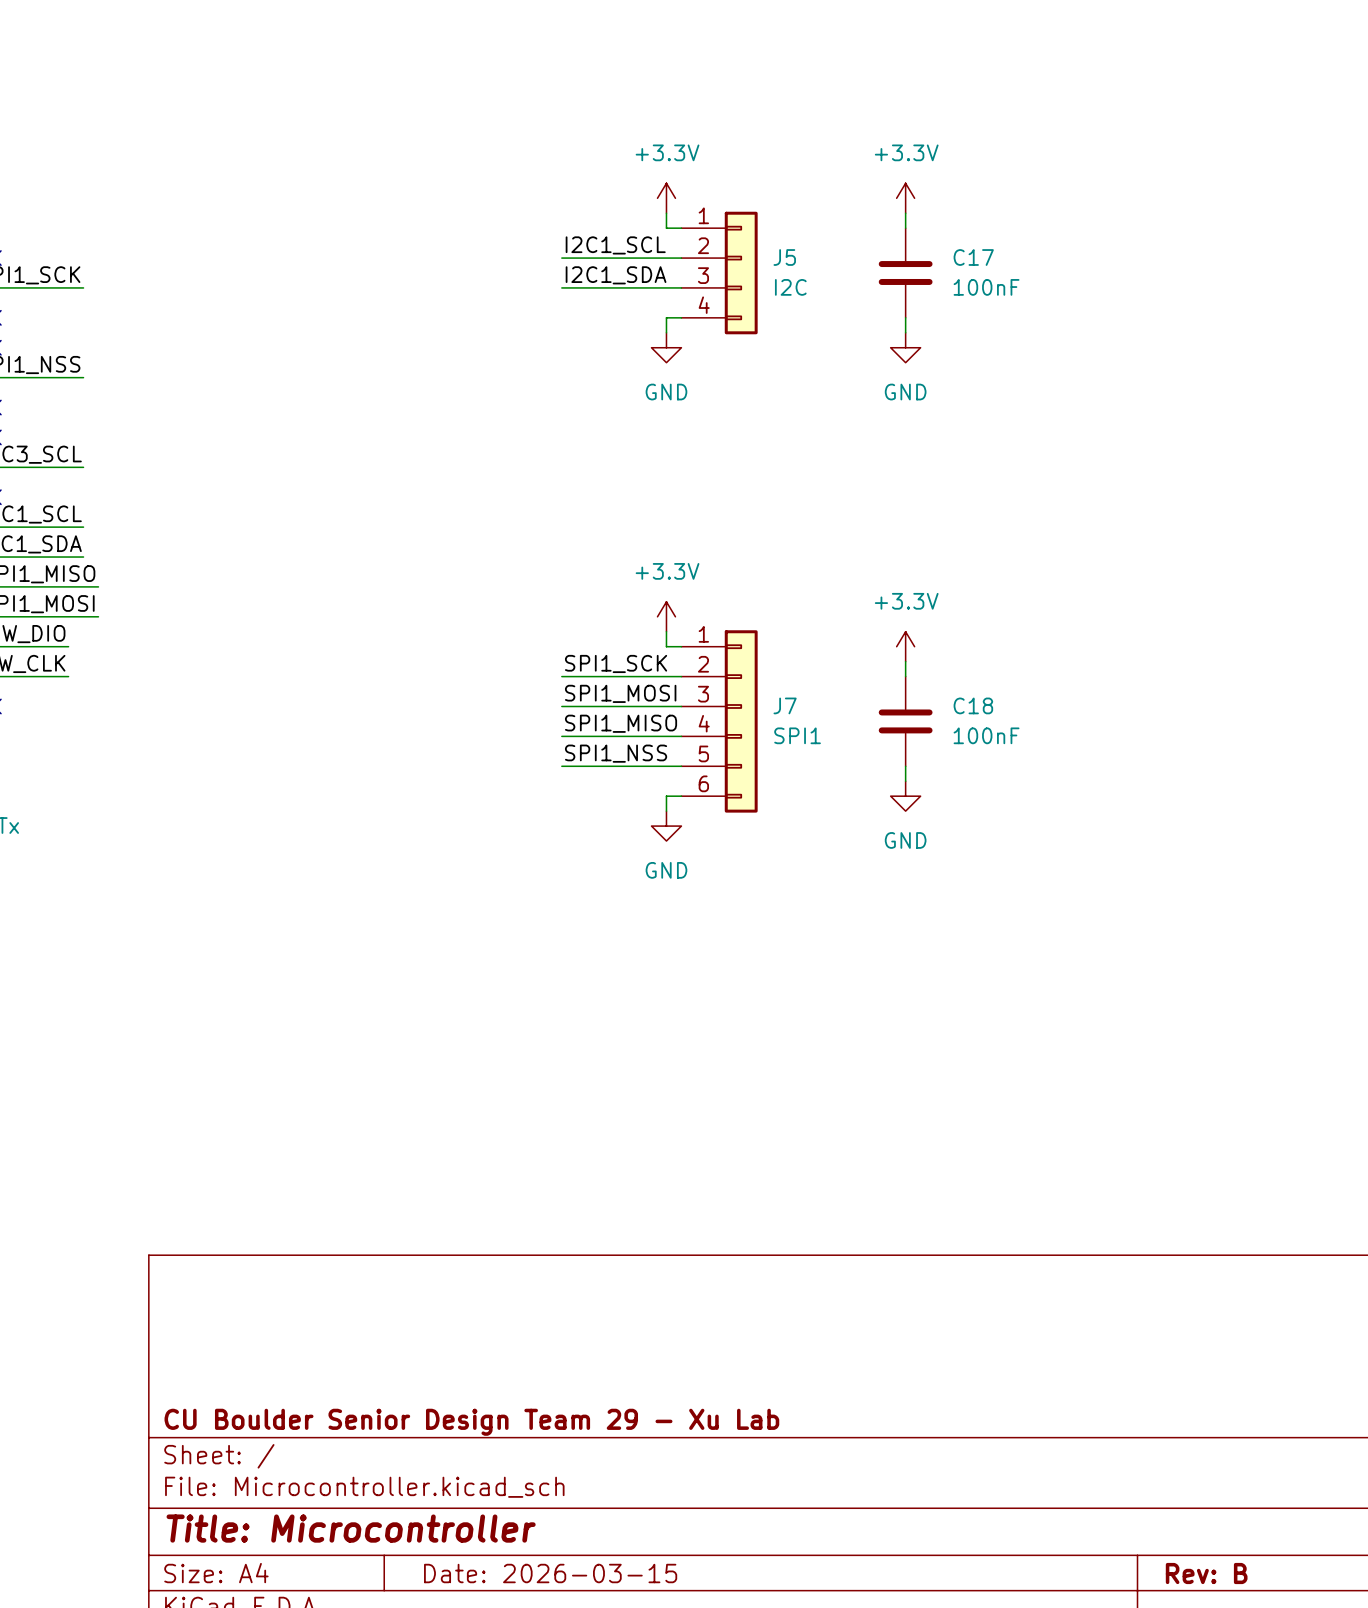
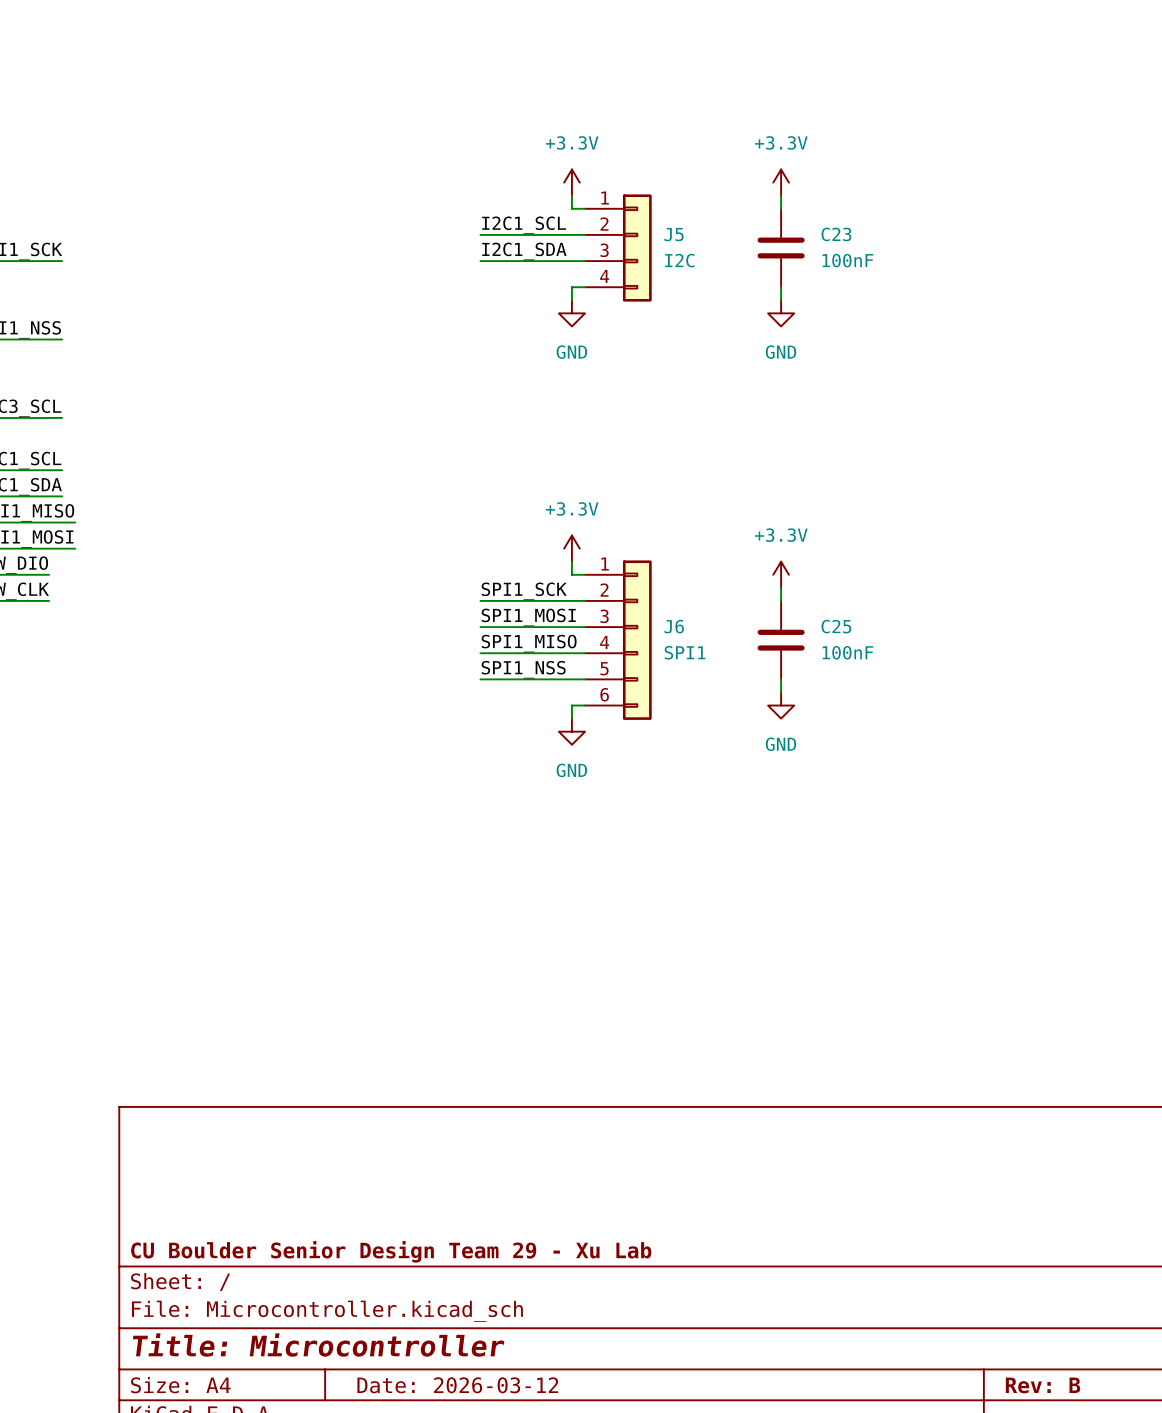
C17 name: C17 (973, 257) -> C23 (836, 234)
J7 name: J7 (785, 705) -> J6 (674, 626)
C18 name: C18 (973, 705) -> C25 (836, 626)
title block: Date: 2026-03-15 (550, 1573) -> Date: 2026-03-12 (457, 1385)

